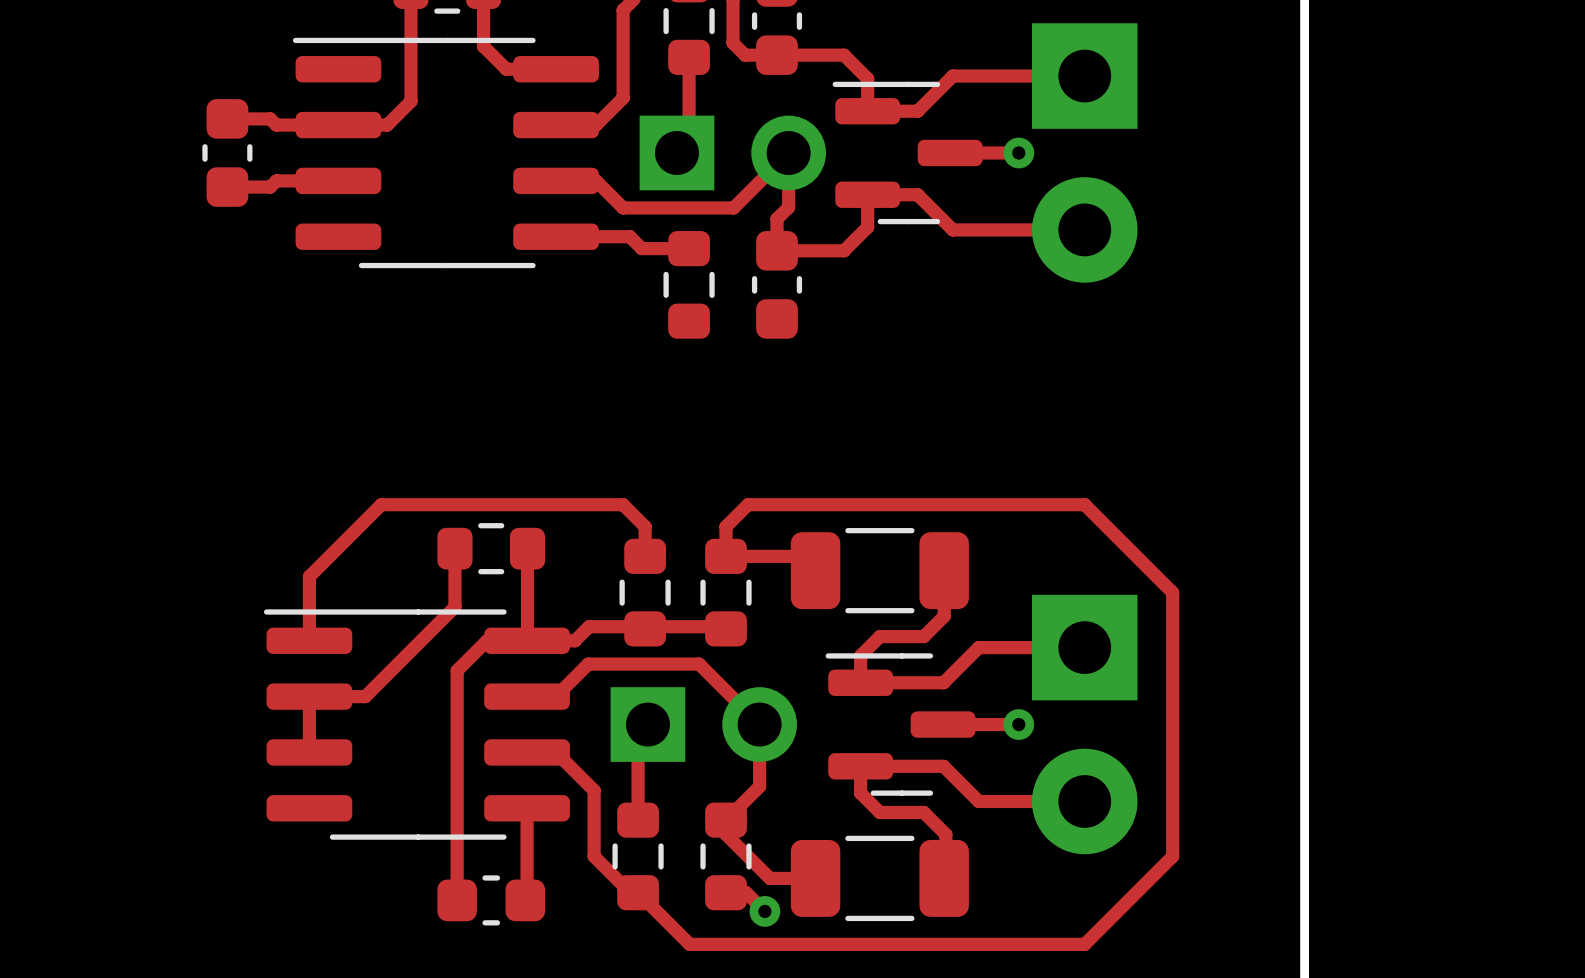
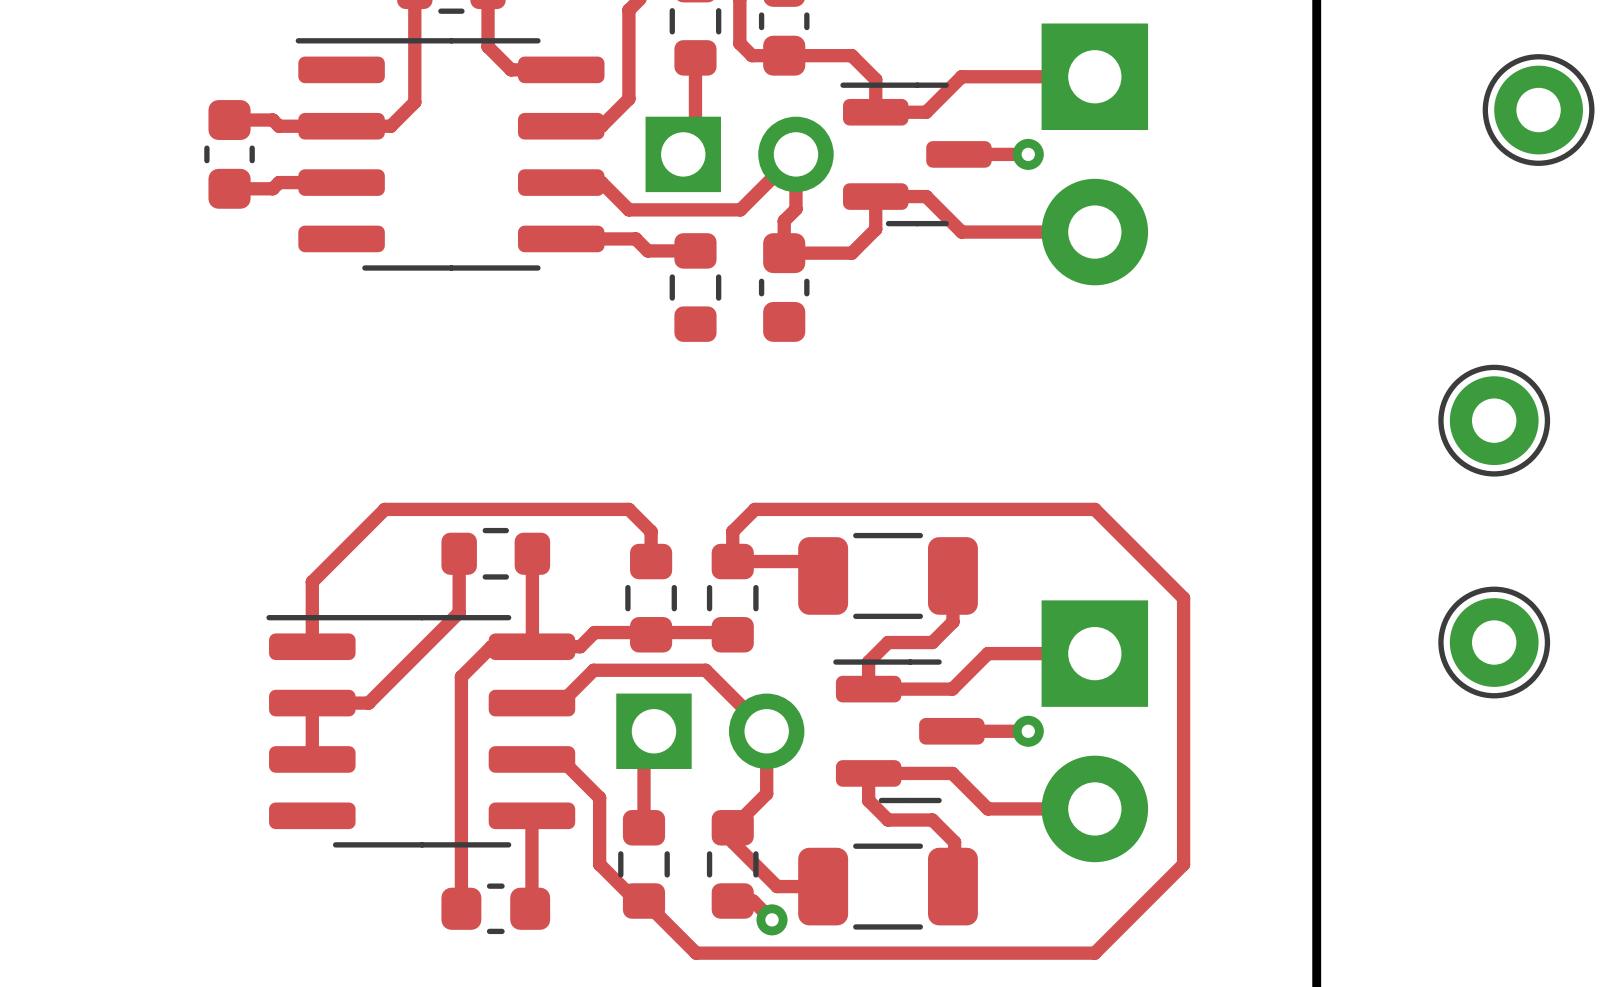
part: none -> (1538, 110)
part: none -> (1494, 420)
part: none -> (1494, 642)

